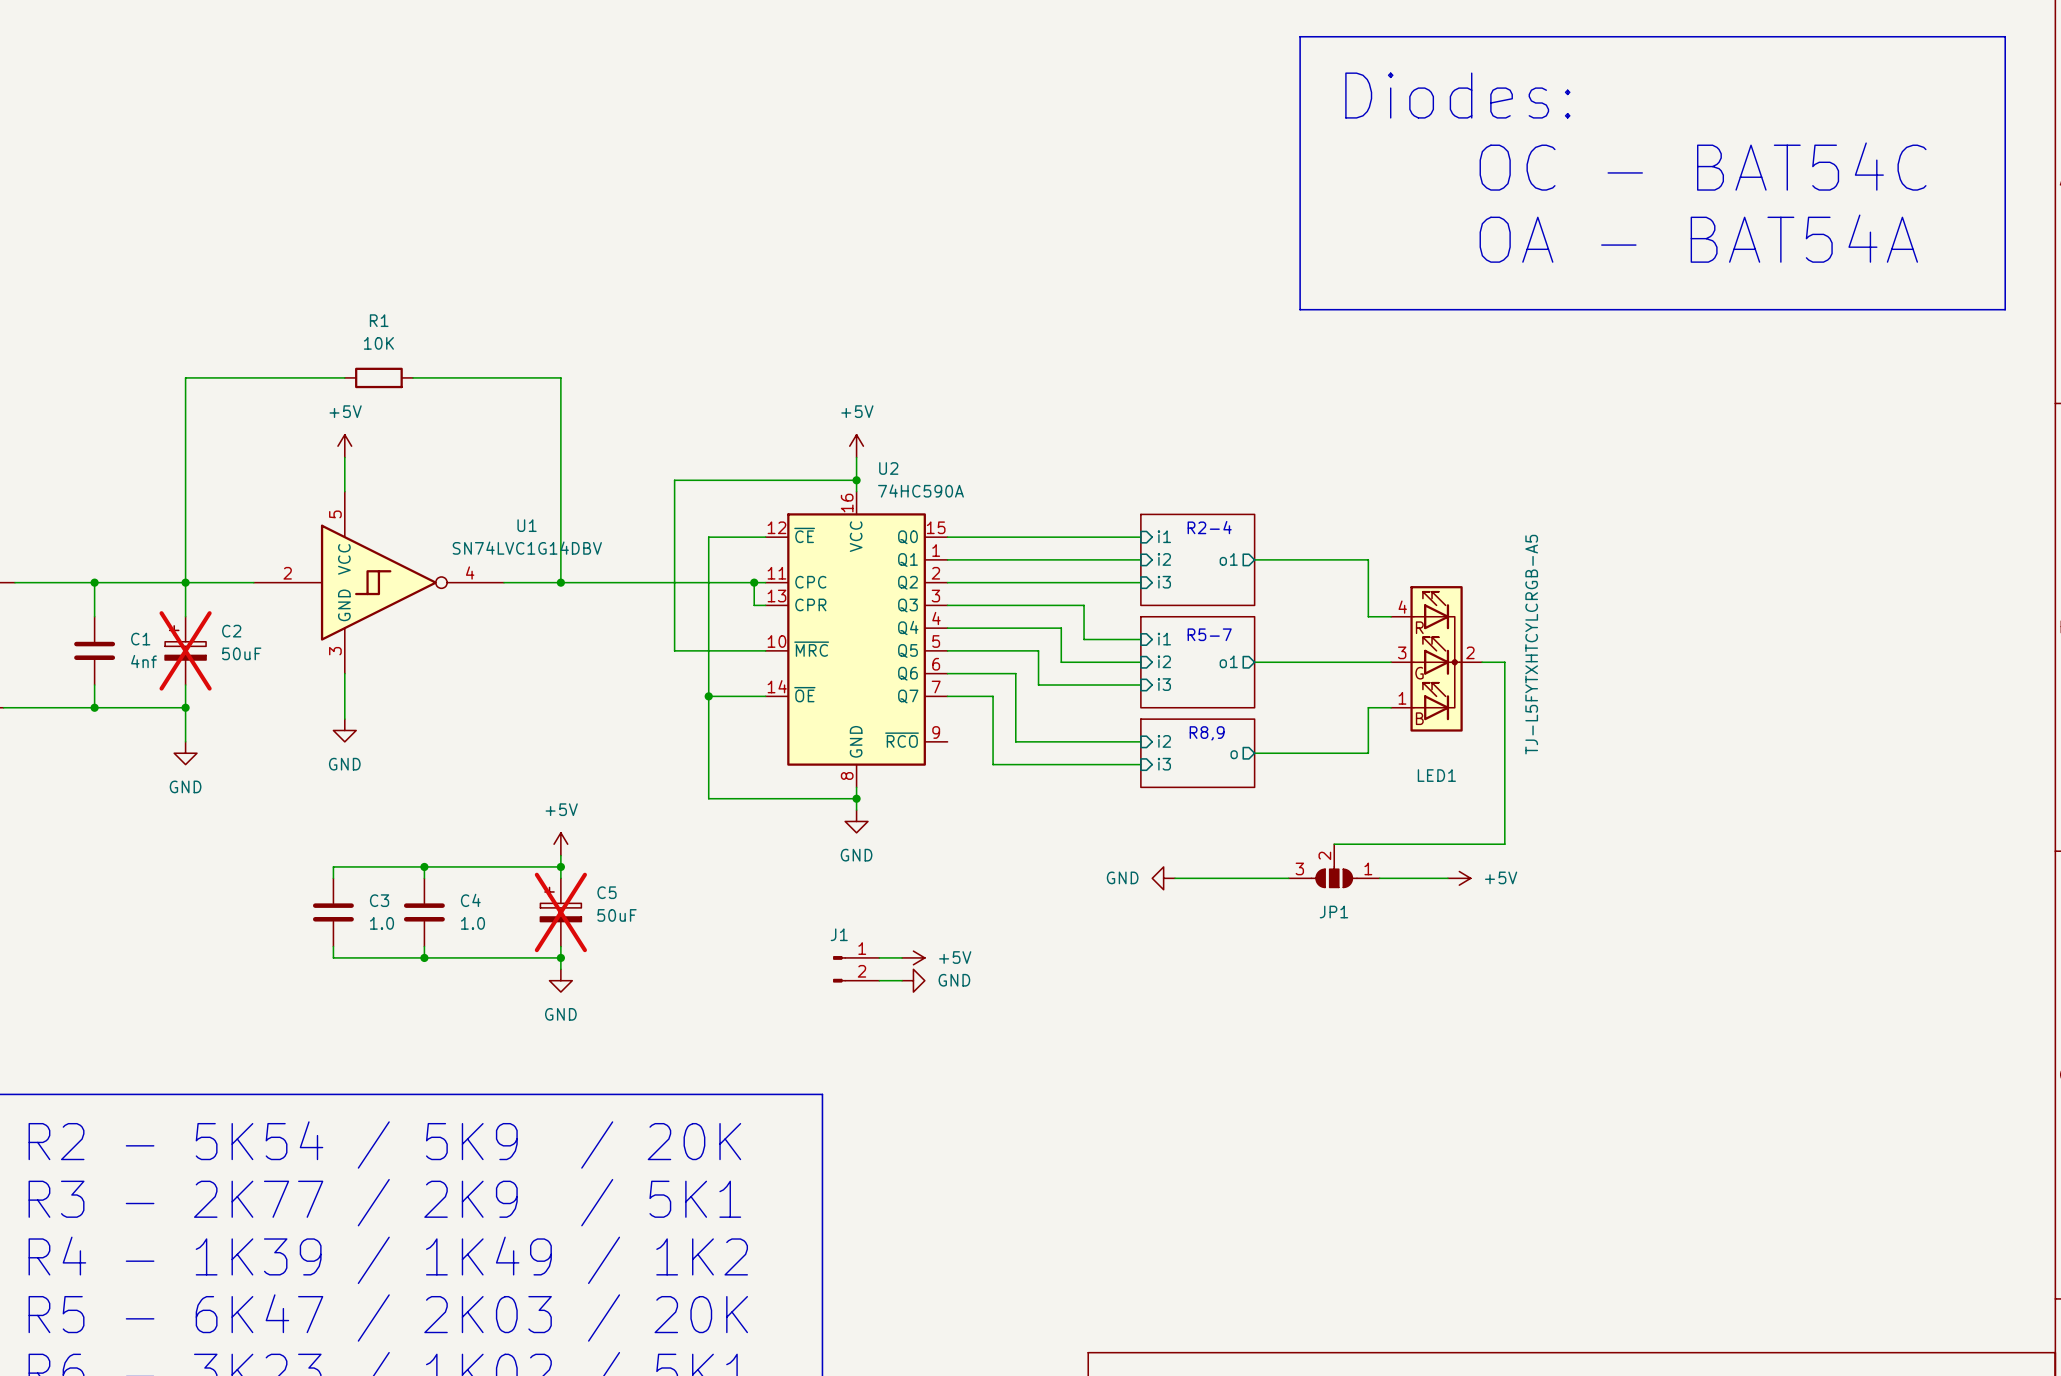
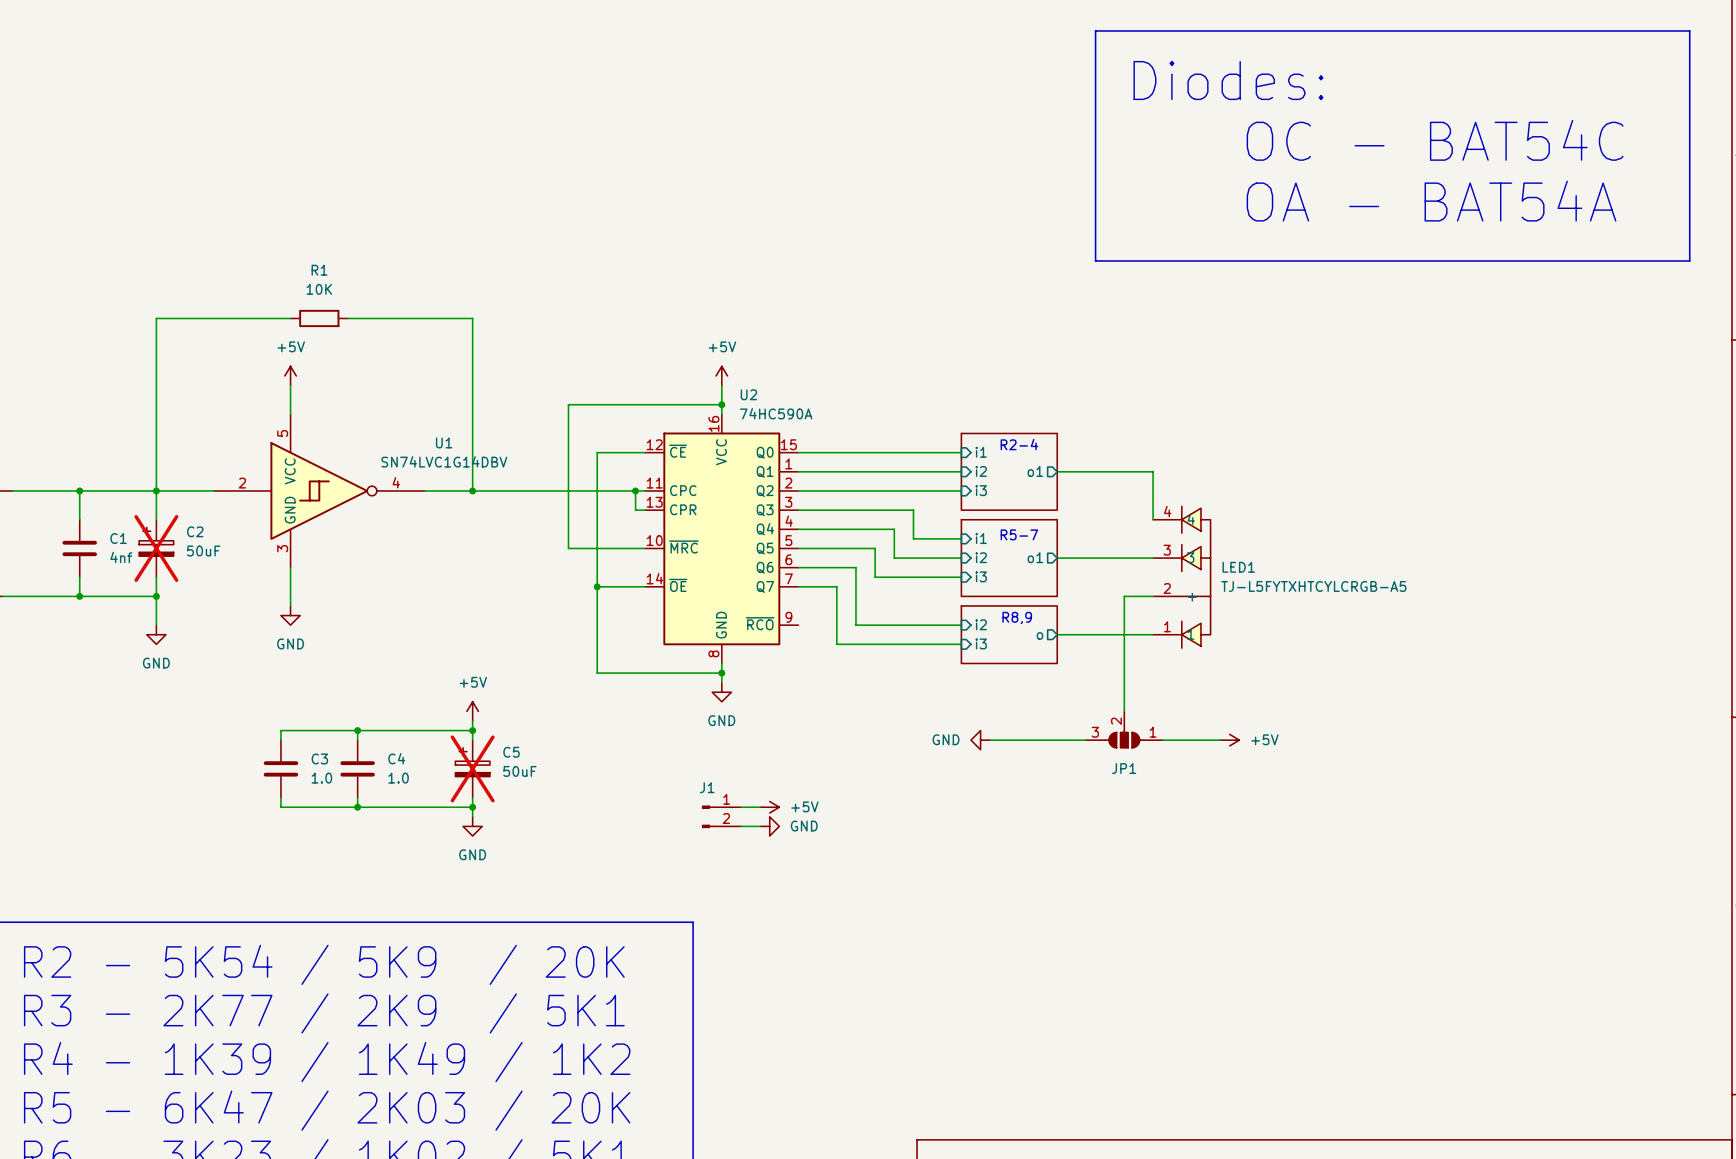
LED1 symbol: [1391, 586, 1483, 732] -> [1153, 506, 1211, 649]
LED1 value position: TJ-L5FYTXHTCYLCRGB-A5 (1531, 644) -> TJ-L5FYTXHTCYLCRGB-A5 (1313, 586)
wire: (1482, 662) (1504, 662) (1504, 844) (1334, 844) -> (1153, 596) (1124, 596) (1124, 711)
wire: (1391, 707) (1368, 707) (1368, 753) -> none
LED1 name position: LED1 (1436, 775) -> LED1 (1238, 567)

